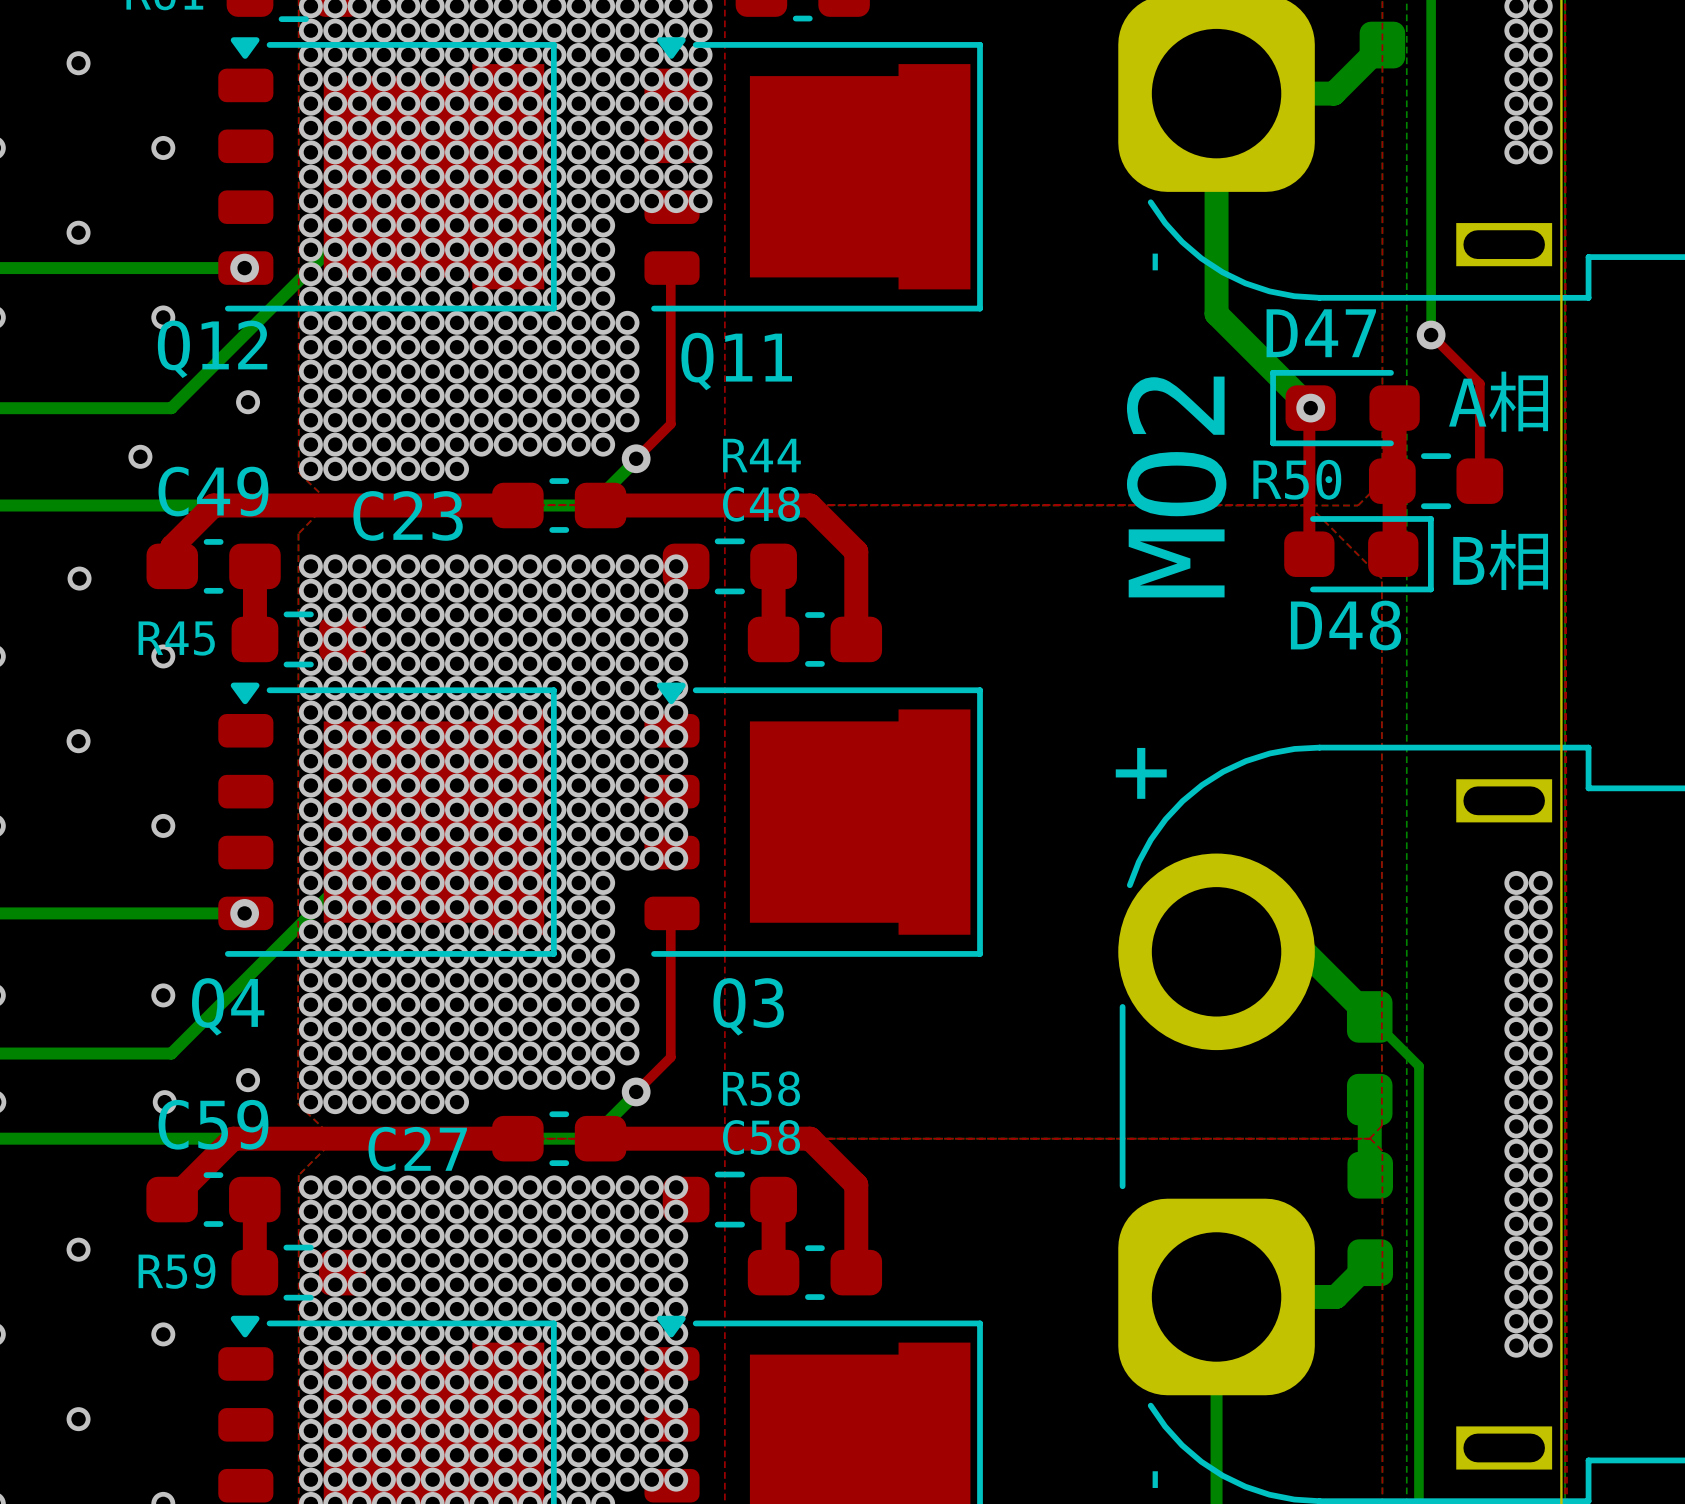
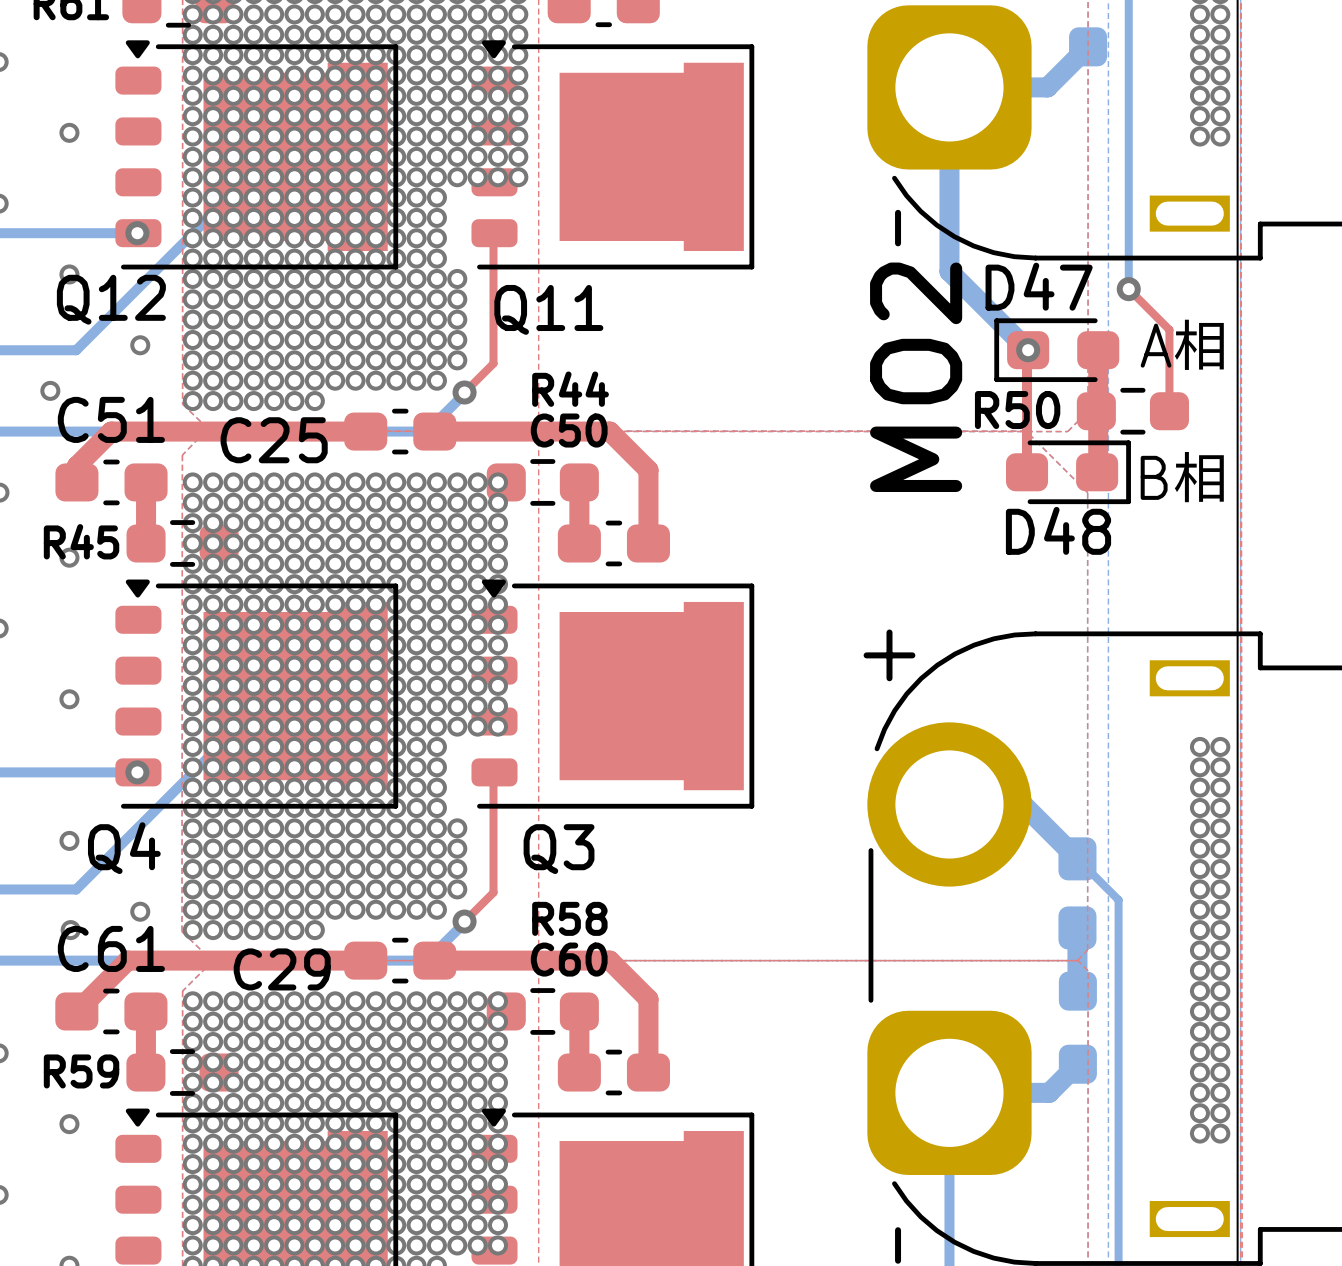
C49 name: C49 (213, 491) -> C51 (111, 419)
C48 name: C48 (761, 504) -> C50 (569, 430)
C23 name: C23 (408, 515) -> C25 (274, 440)
C59 name: C59 (213, 1124) -> C61 (111, 948)
C58 name: C58 (761, 1137) -> C60 (569, 959)
C27 name: C27 (417, 1149) -> C29 (282, 969)

